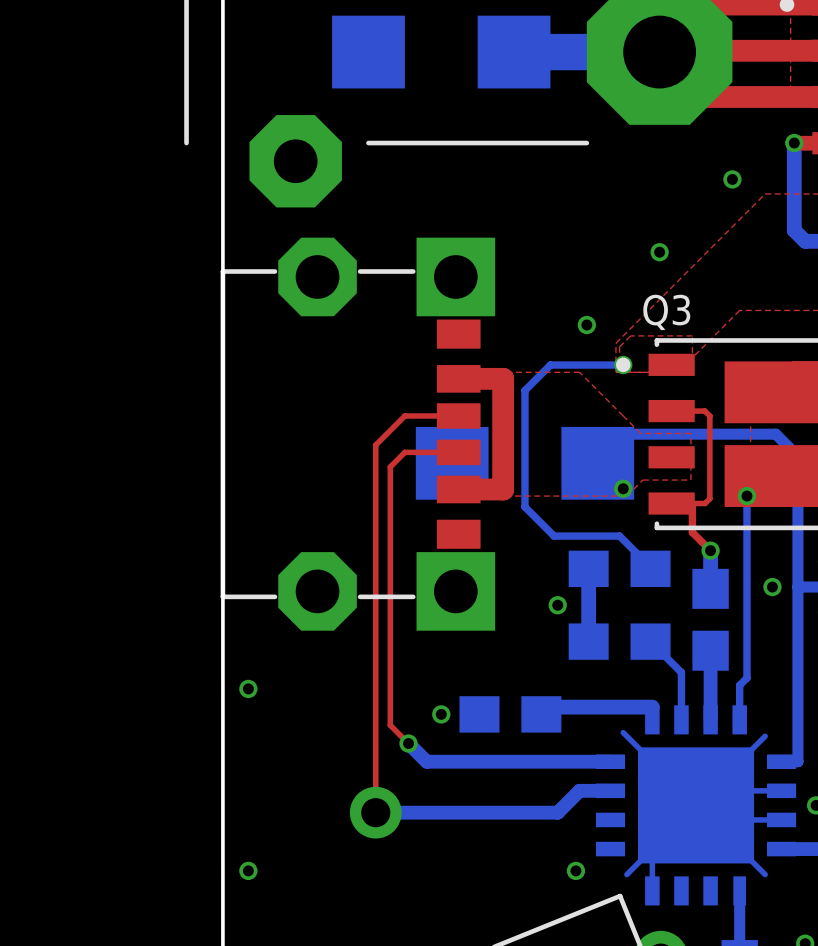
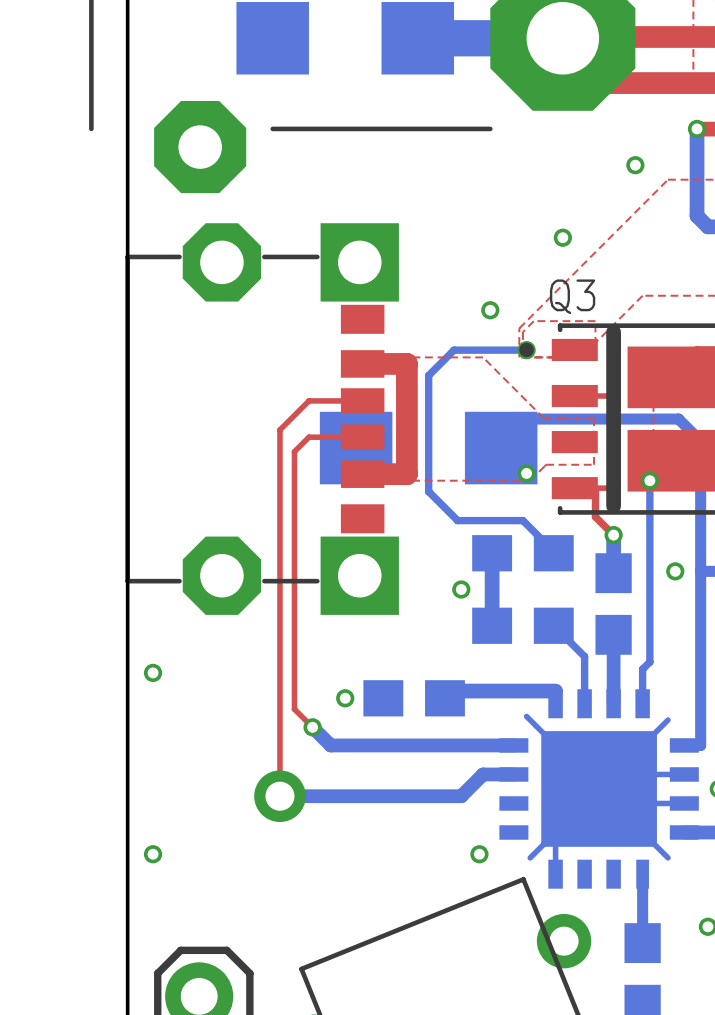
line: none -> (613, 332) (613, 506)

